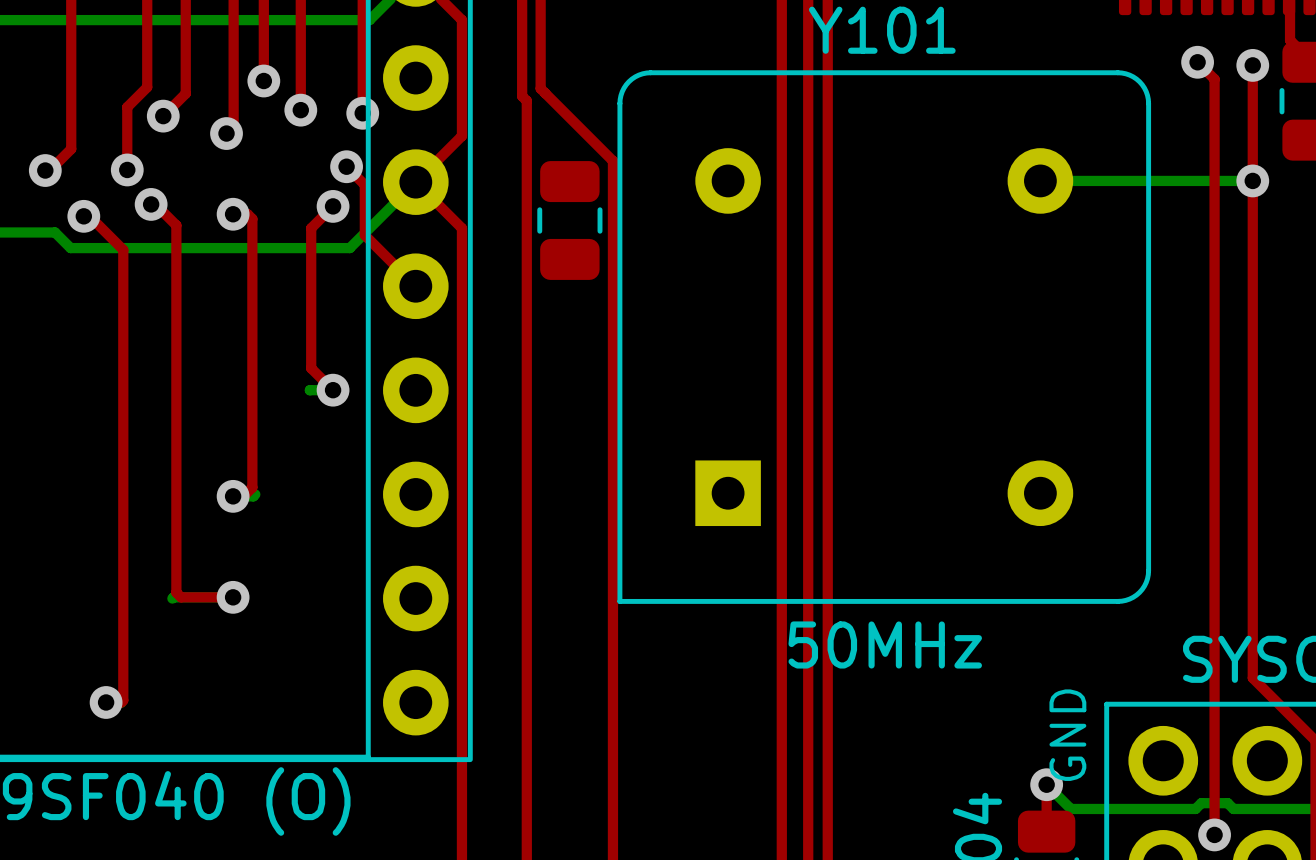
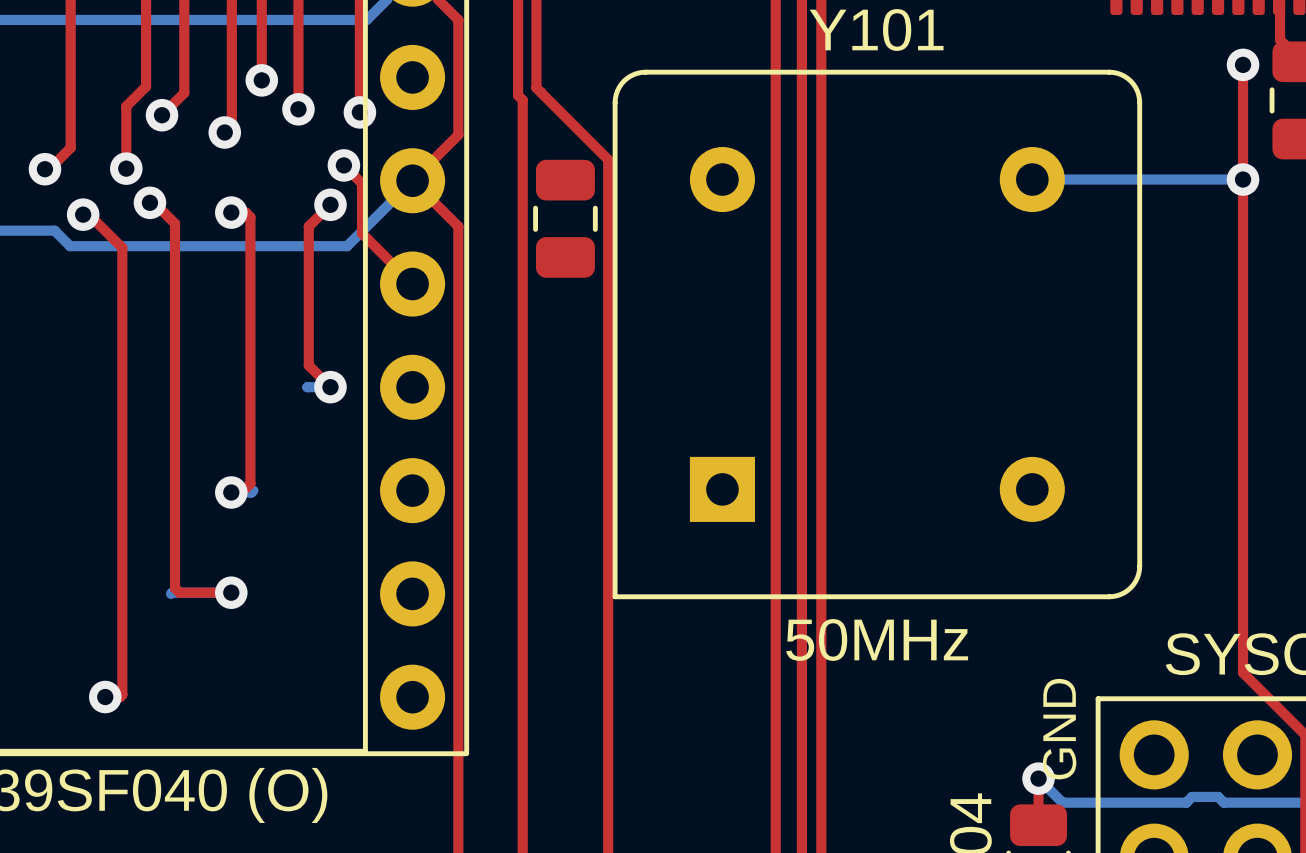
top track: (1197, 62) (1214, 79) (1214, 834) -> none
via: (1197, 62) -> none
via: (1214, 834) -> none

